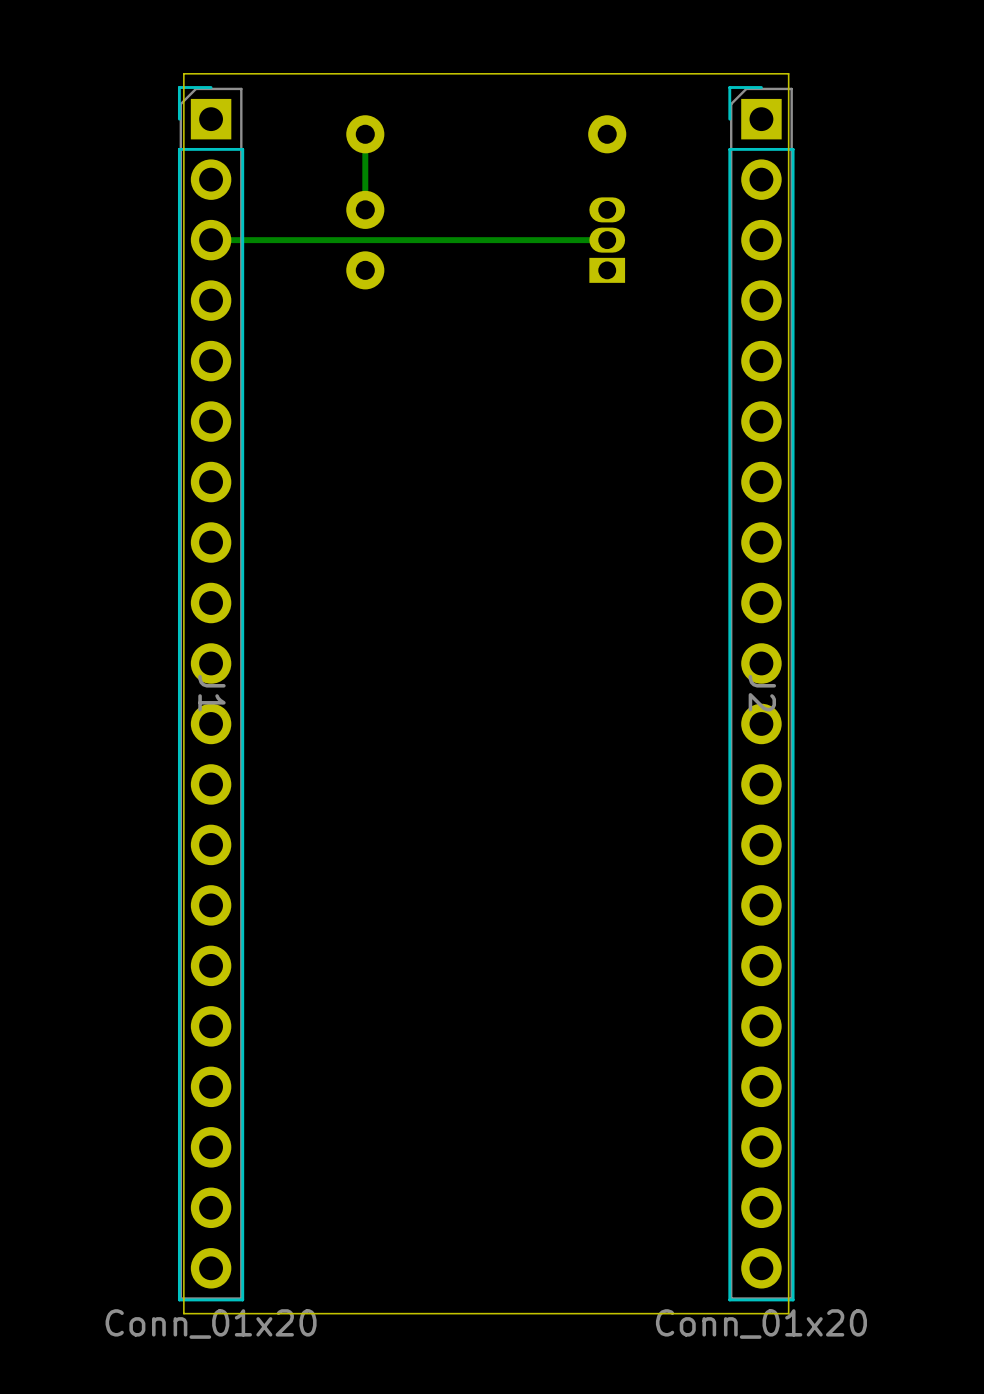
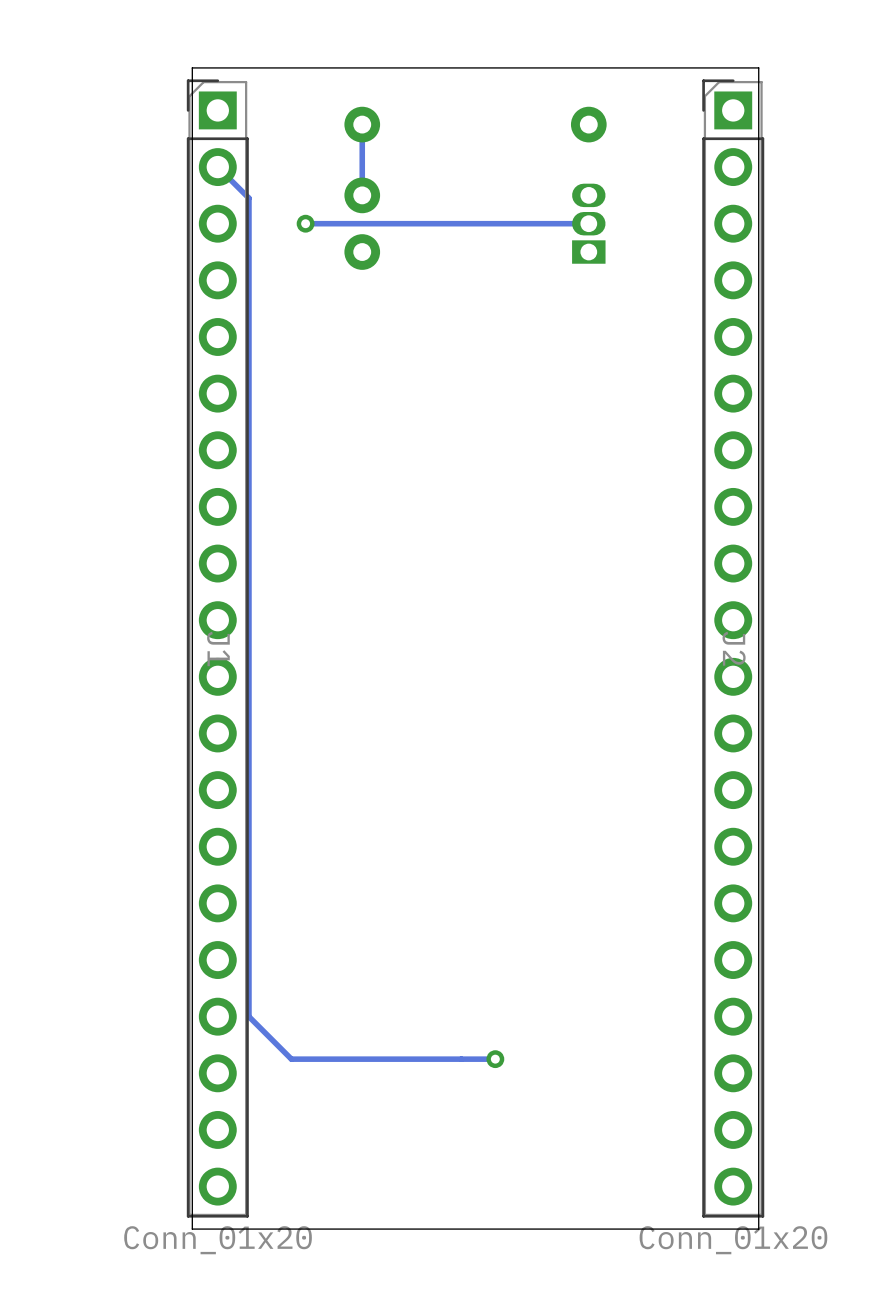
track: none -> (217, 167) (248, 198) (248, 1016) (291, 1059) (495, 1059)
track: (304, 240) (211, 240) -> none
via: none -> (305, 223)
via: none -> (495, 1059)

